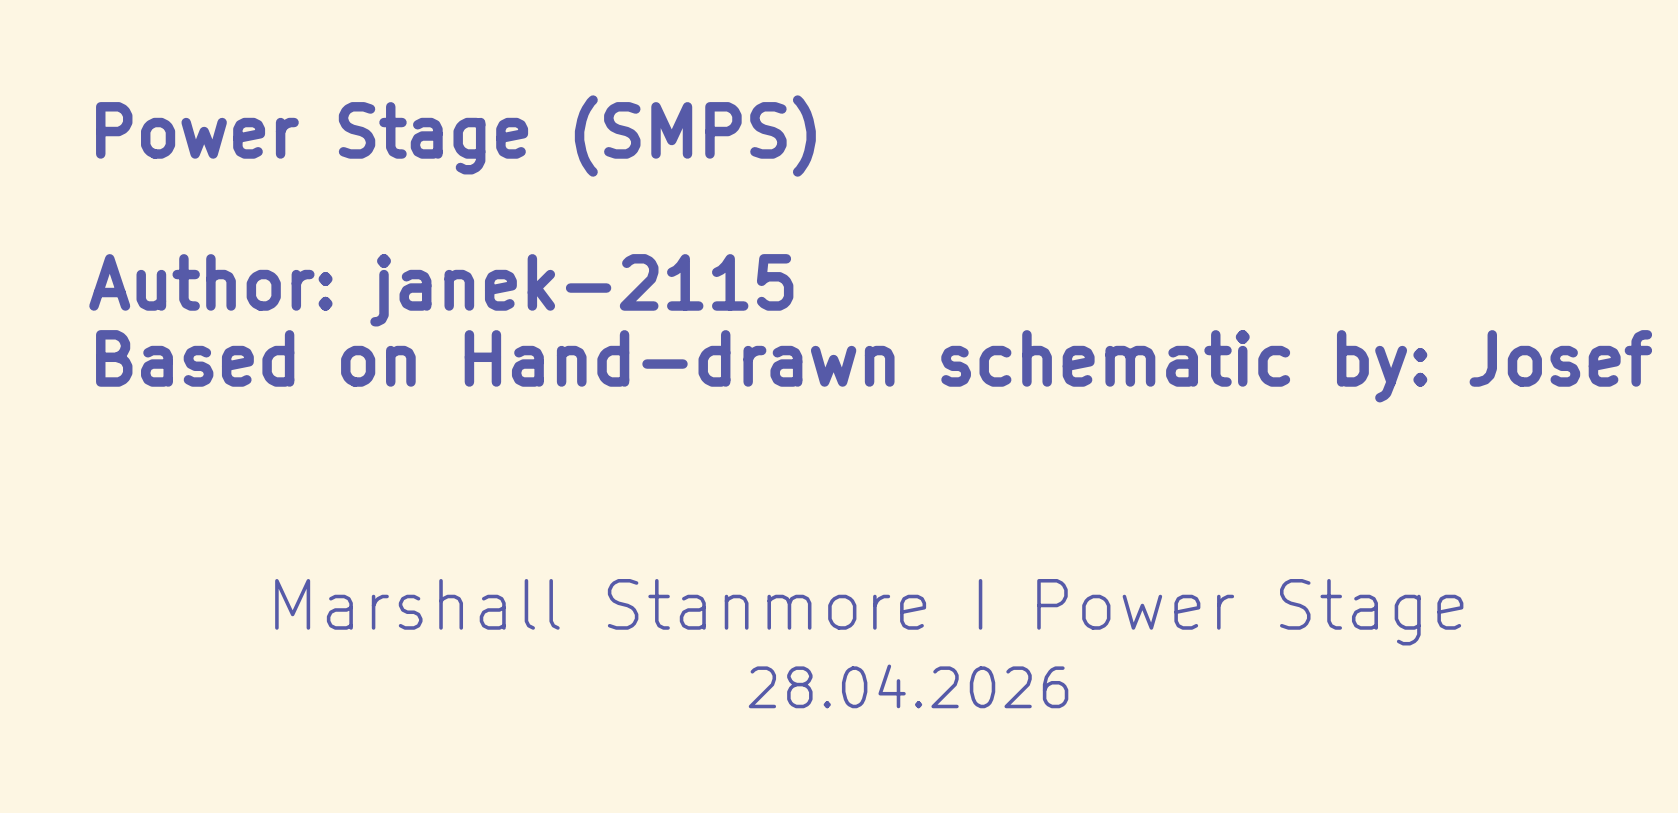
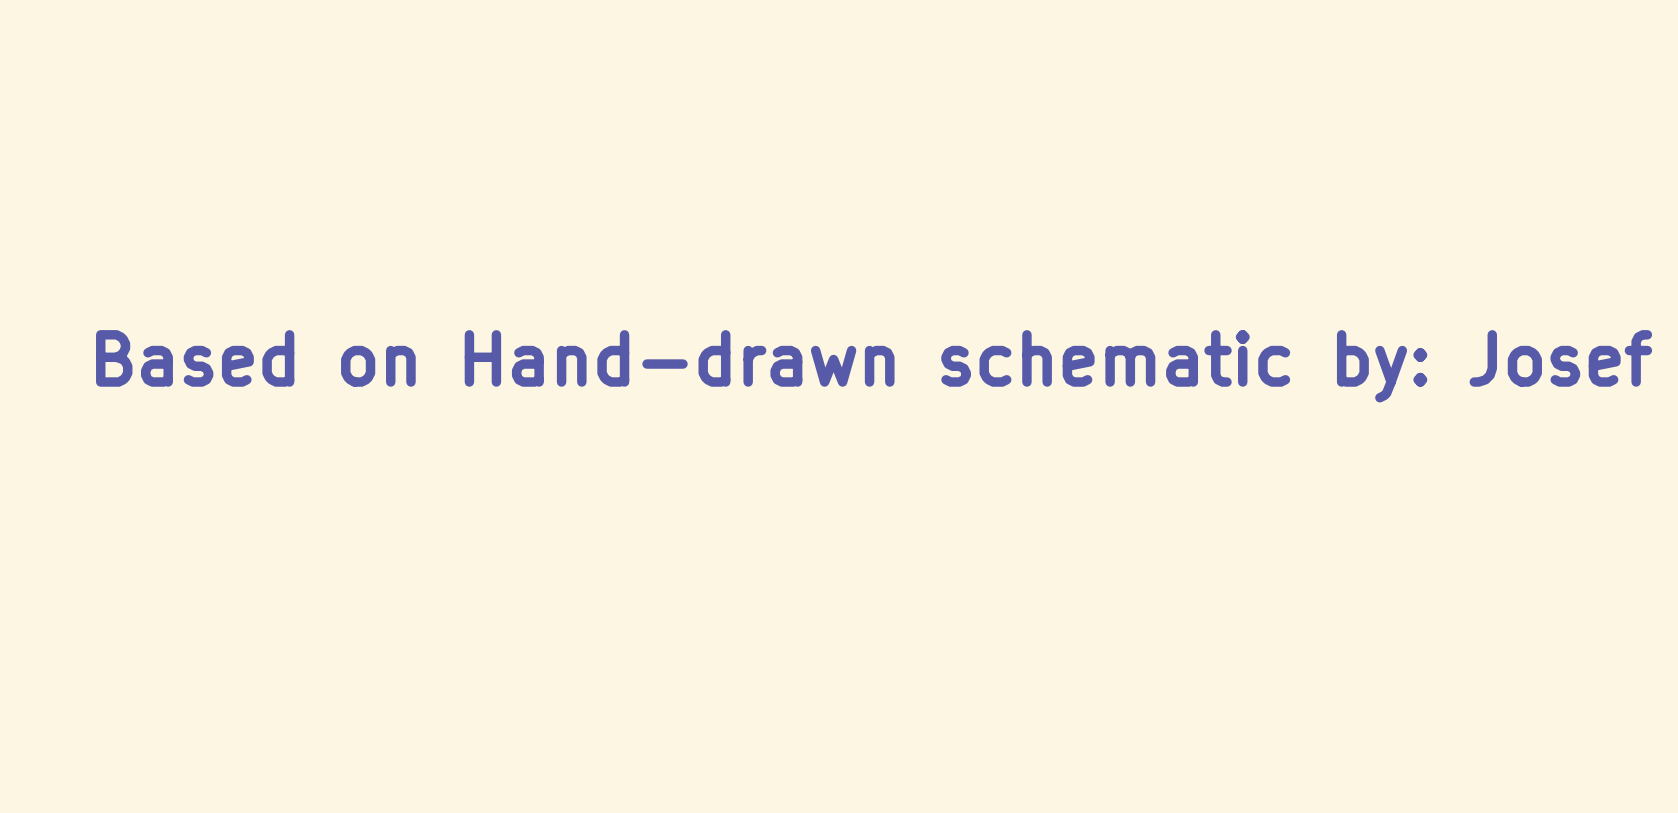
text: Power Stage (SMPS) (455, 136) -> none
text: Author: janek-2115 (441, 290) -> none
text: Marshall Stanmore I Power Stage (869, 612) -> none
text: 28.04.2026 (908, 686) -> none

